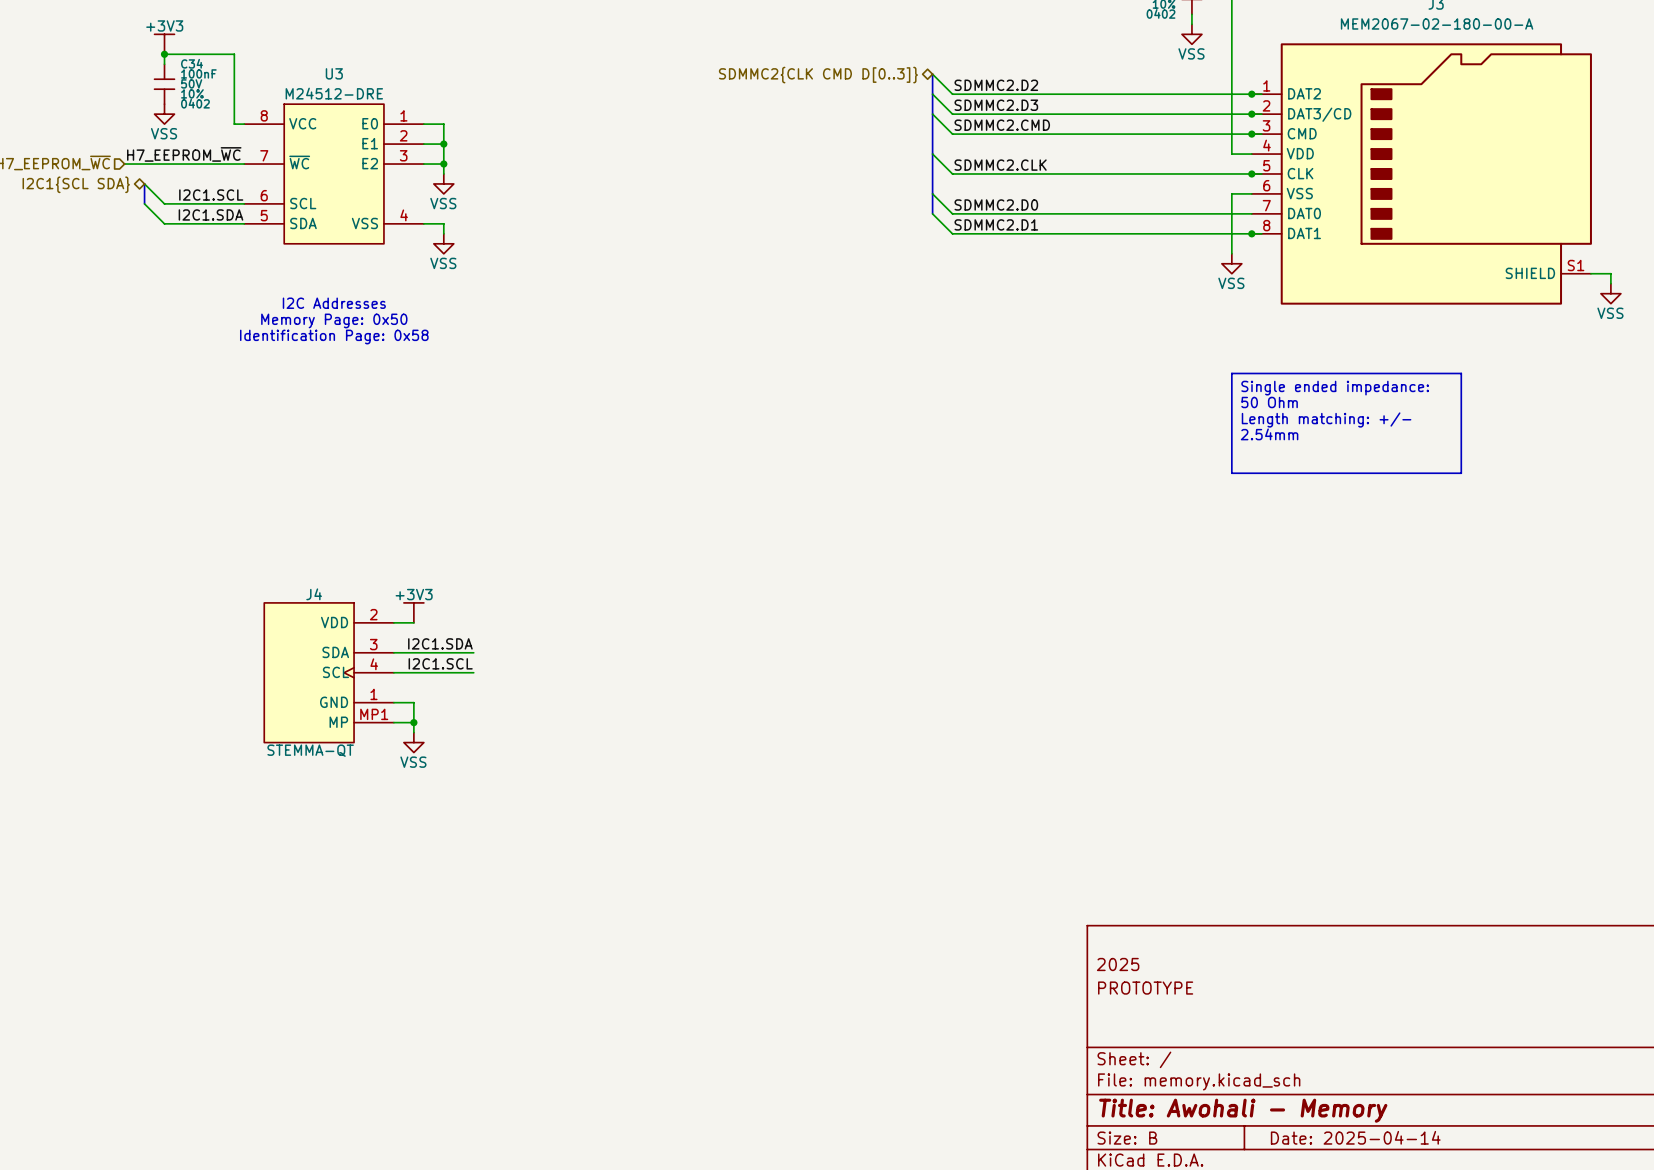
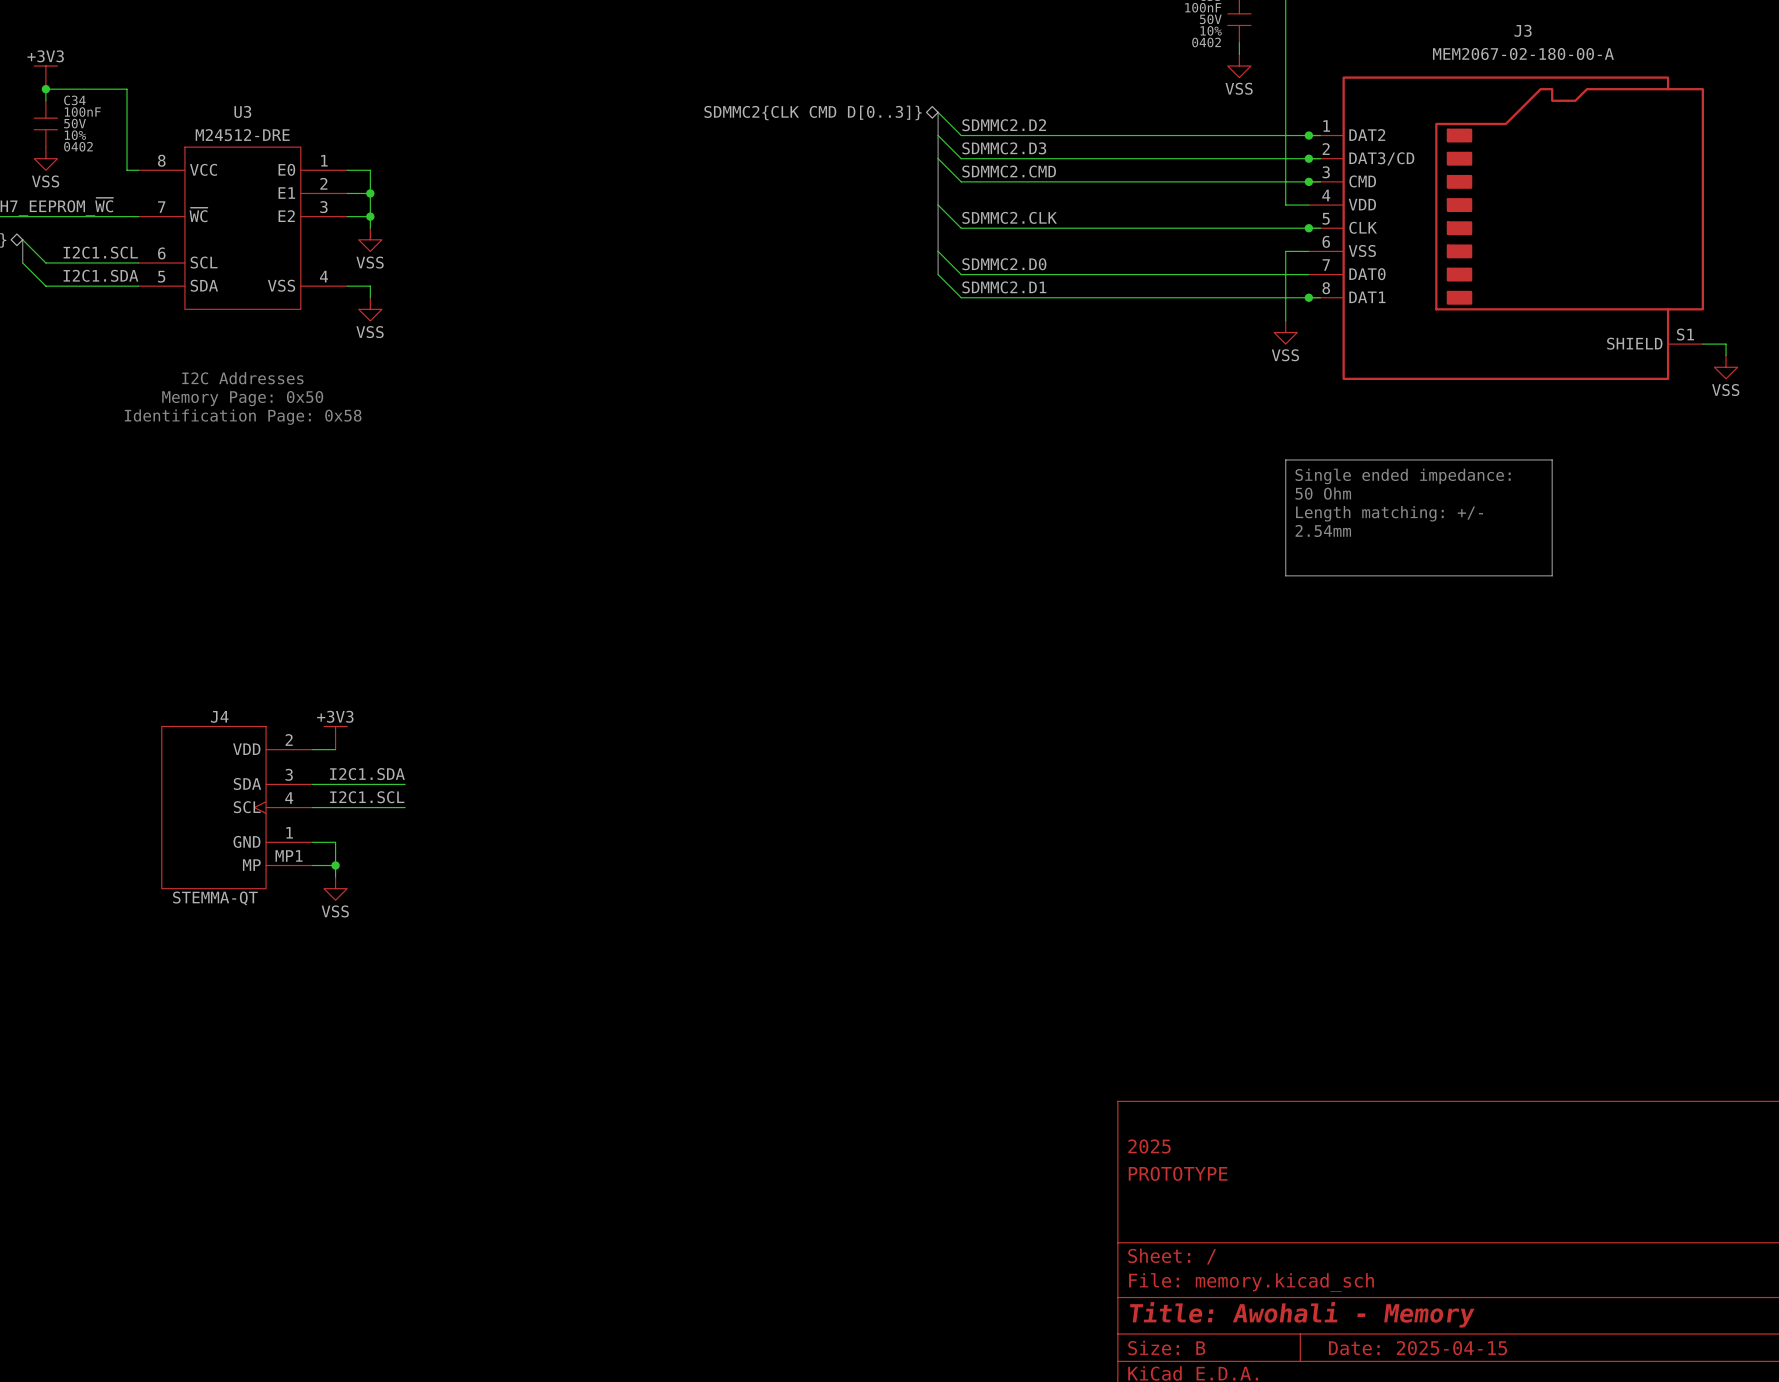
title block: Date: 2025-04-14 (1355, 1137) -> Date: 2025-04-15 (1417, 1348)

